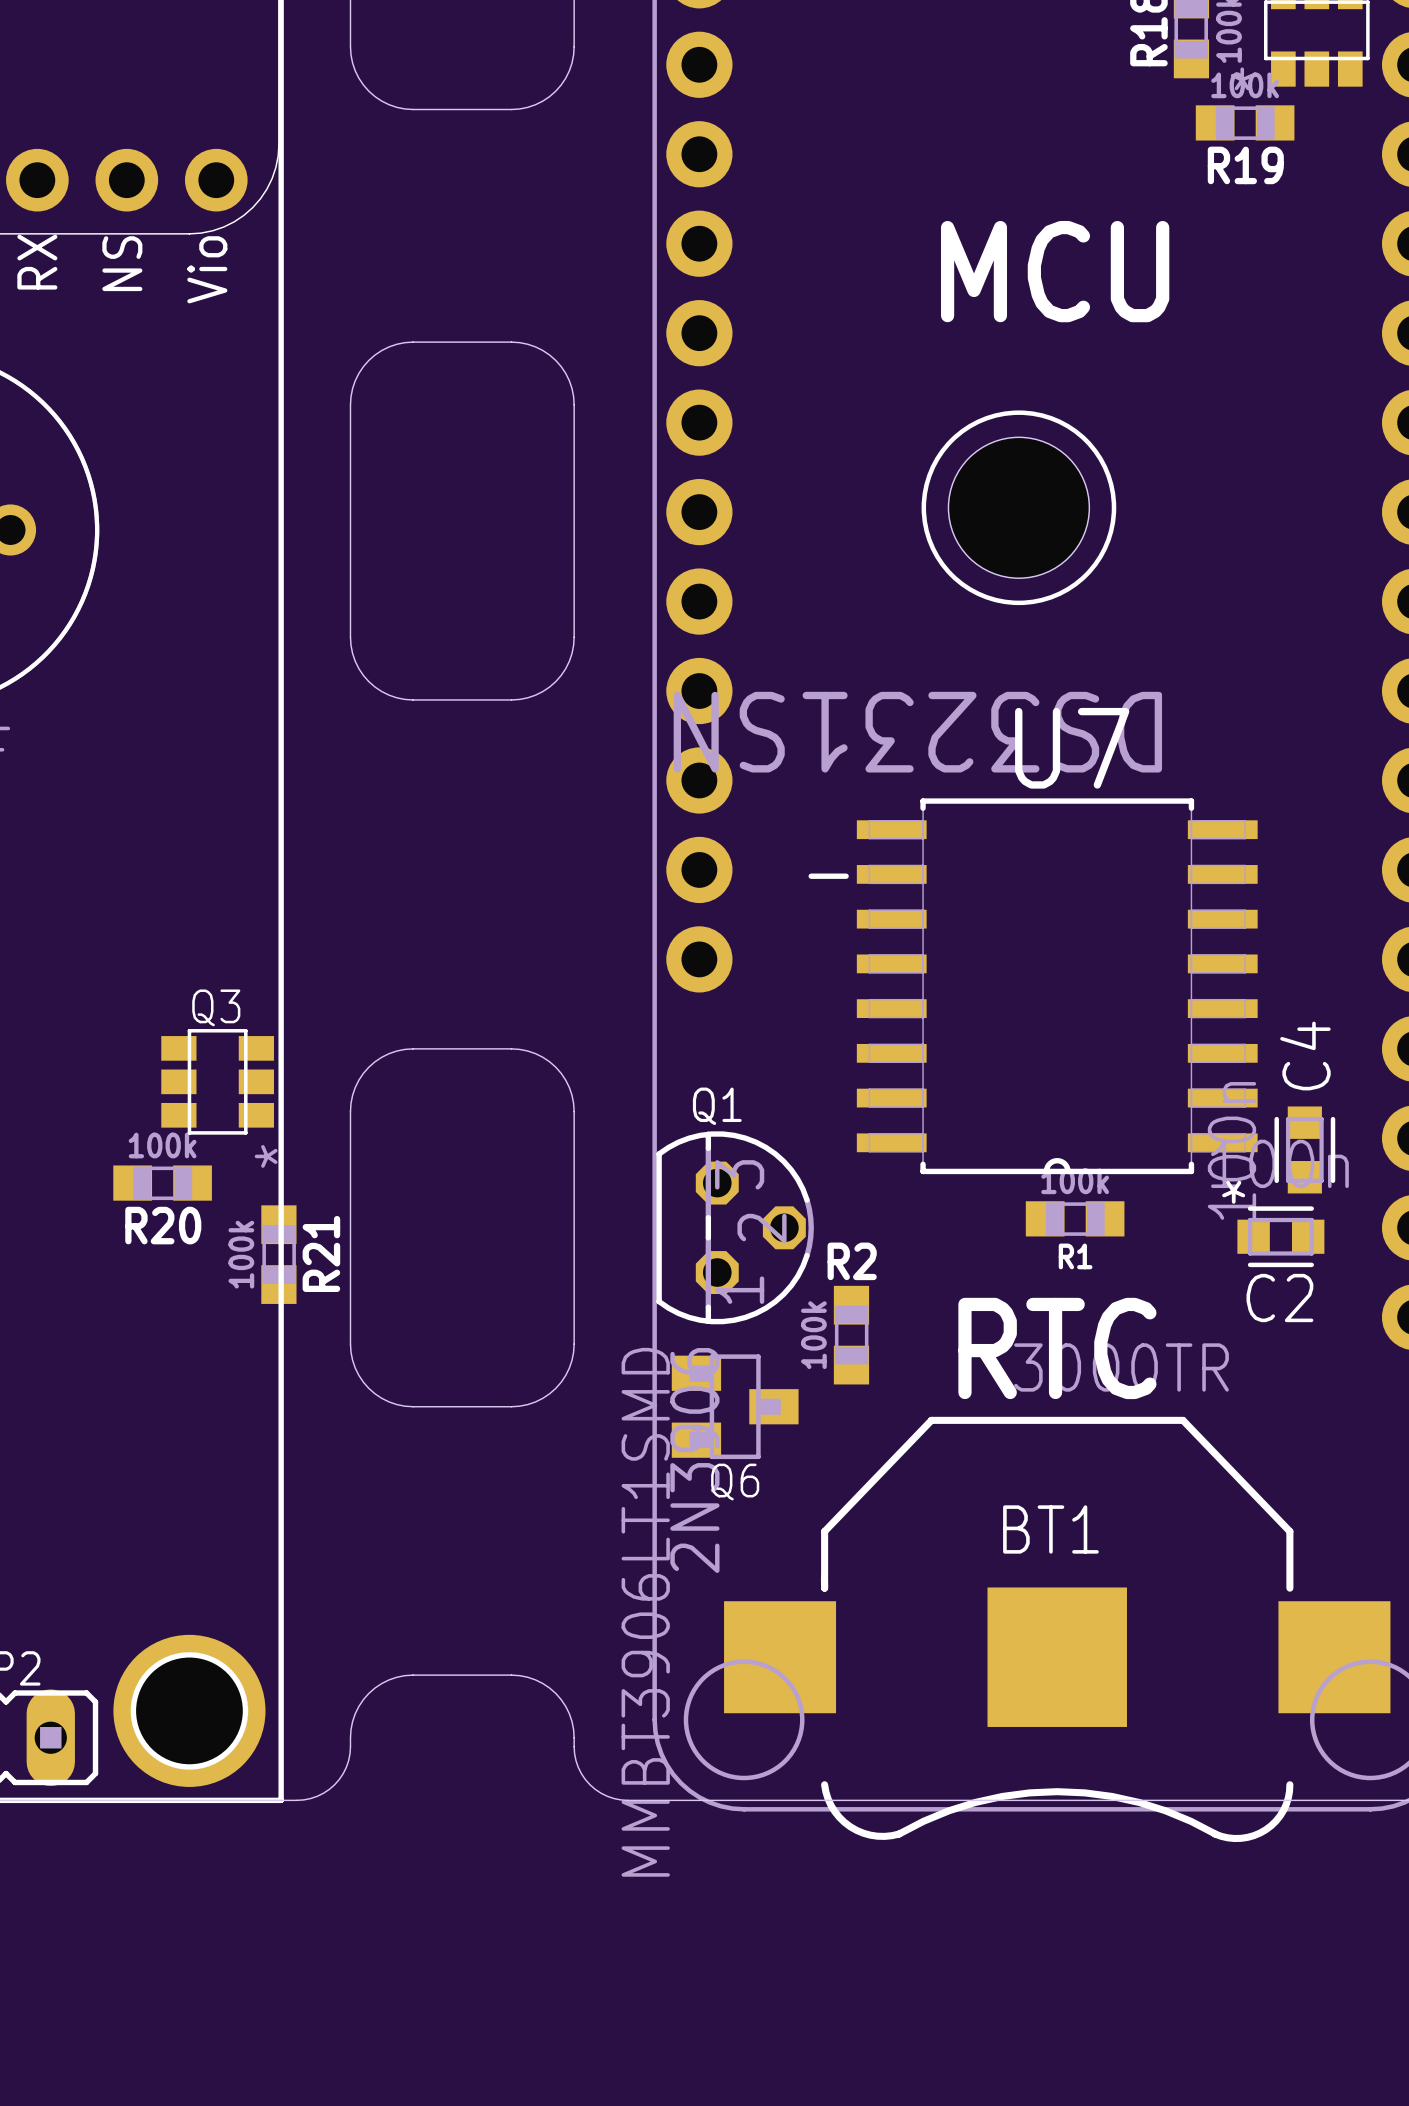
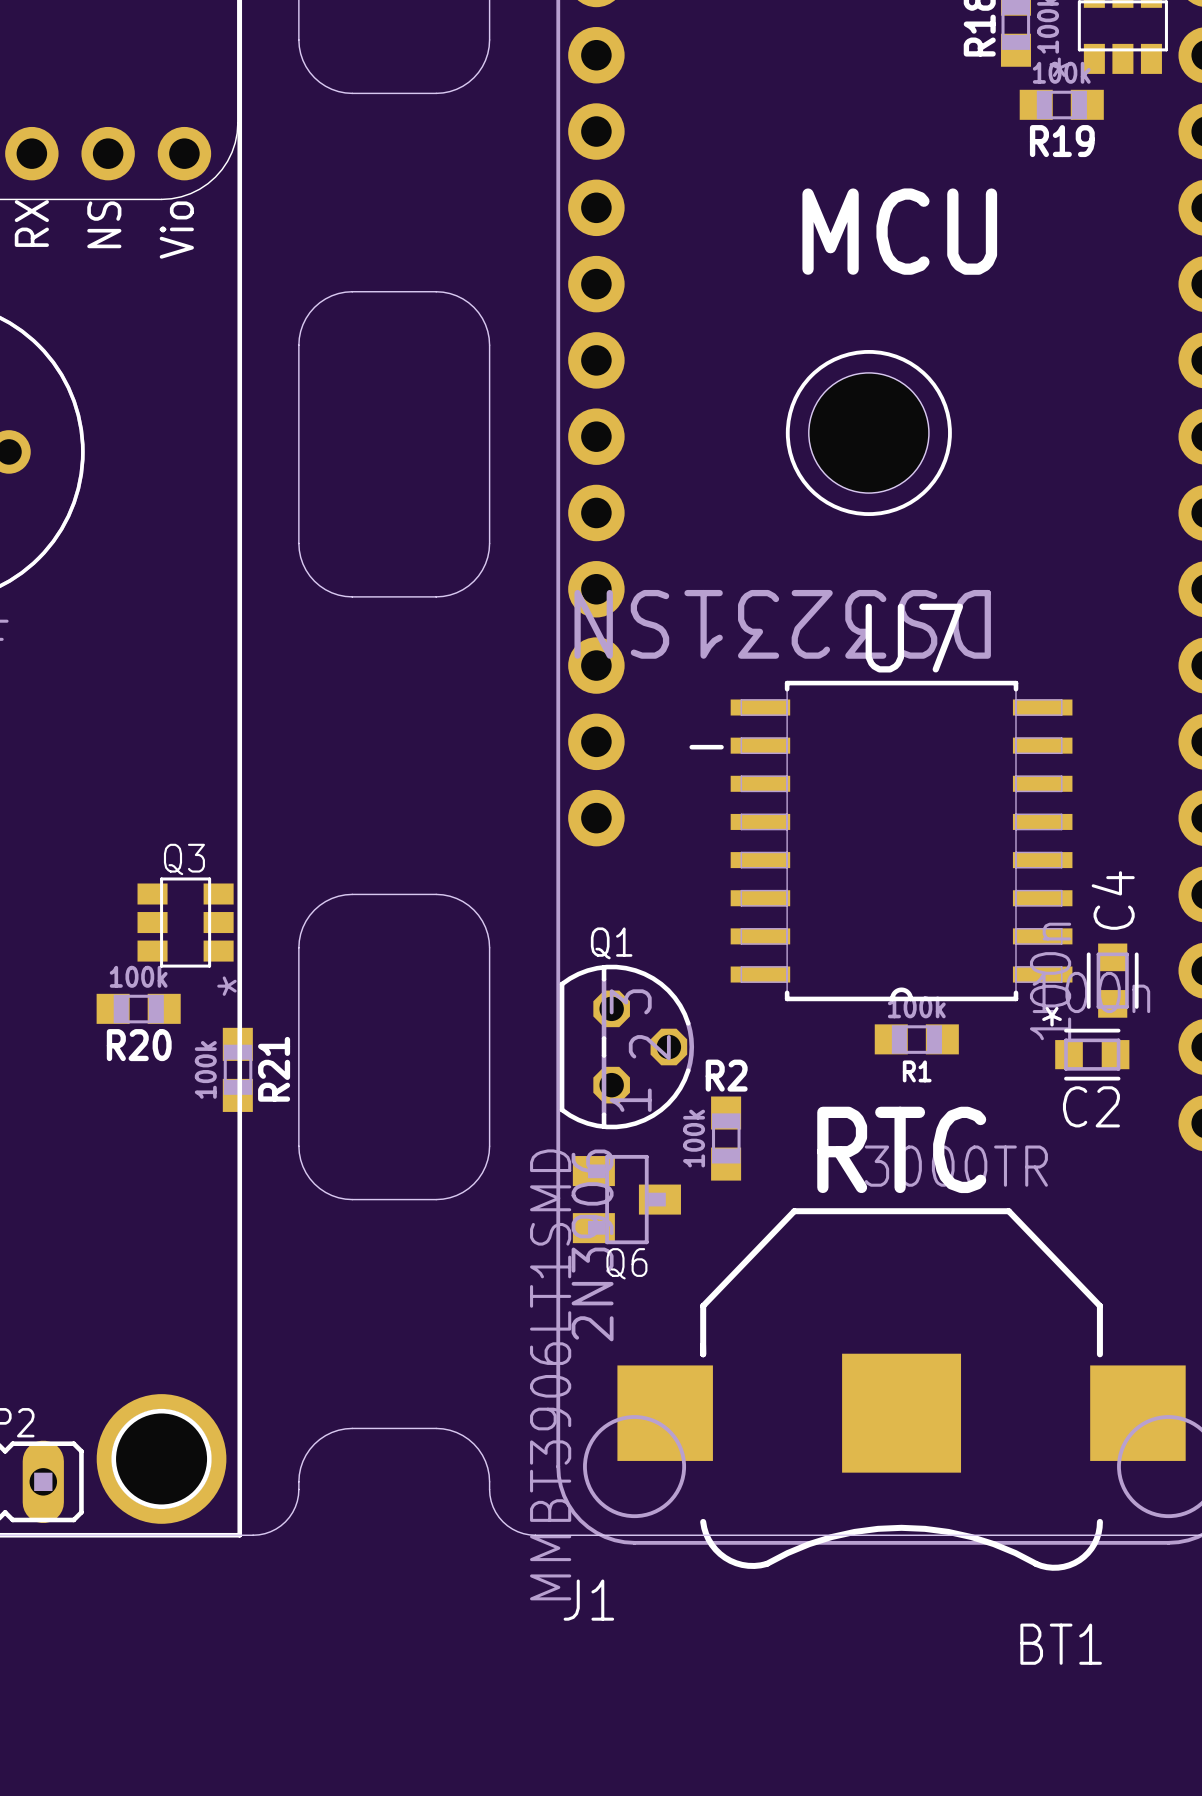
BT1 name position: BT1 (1050, 1529) -> BT1 (1061, 1644)
J1 name: none -> J1 (588, 1600)

